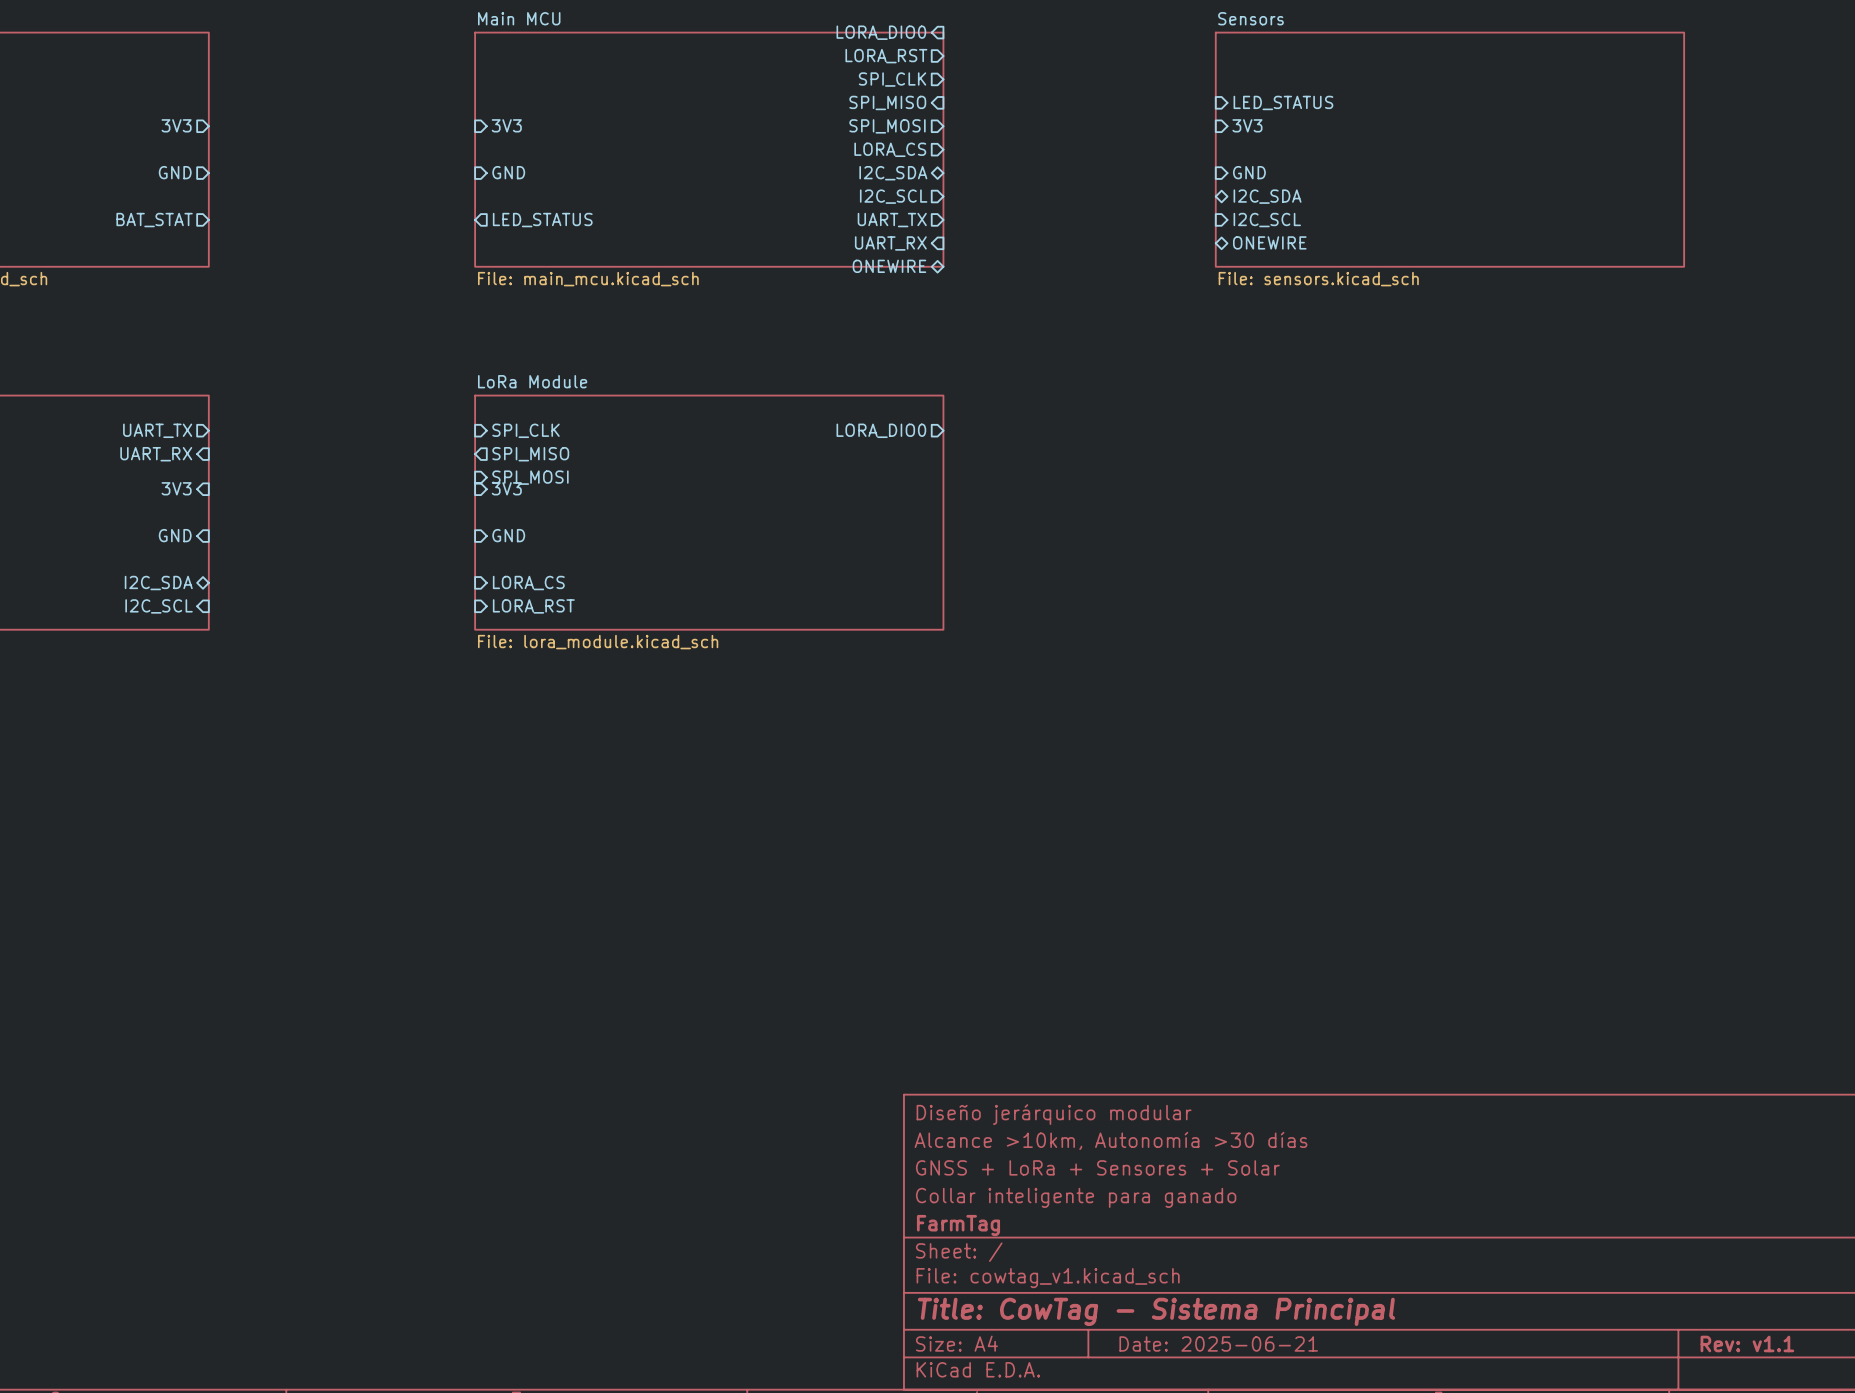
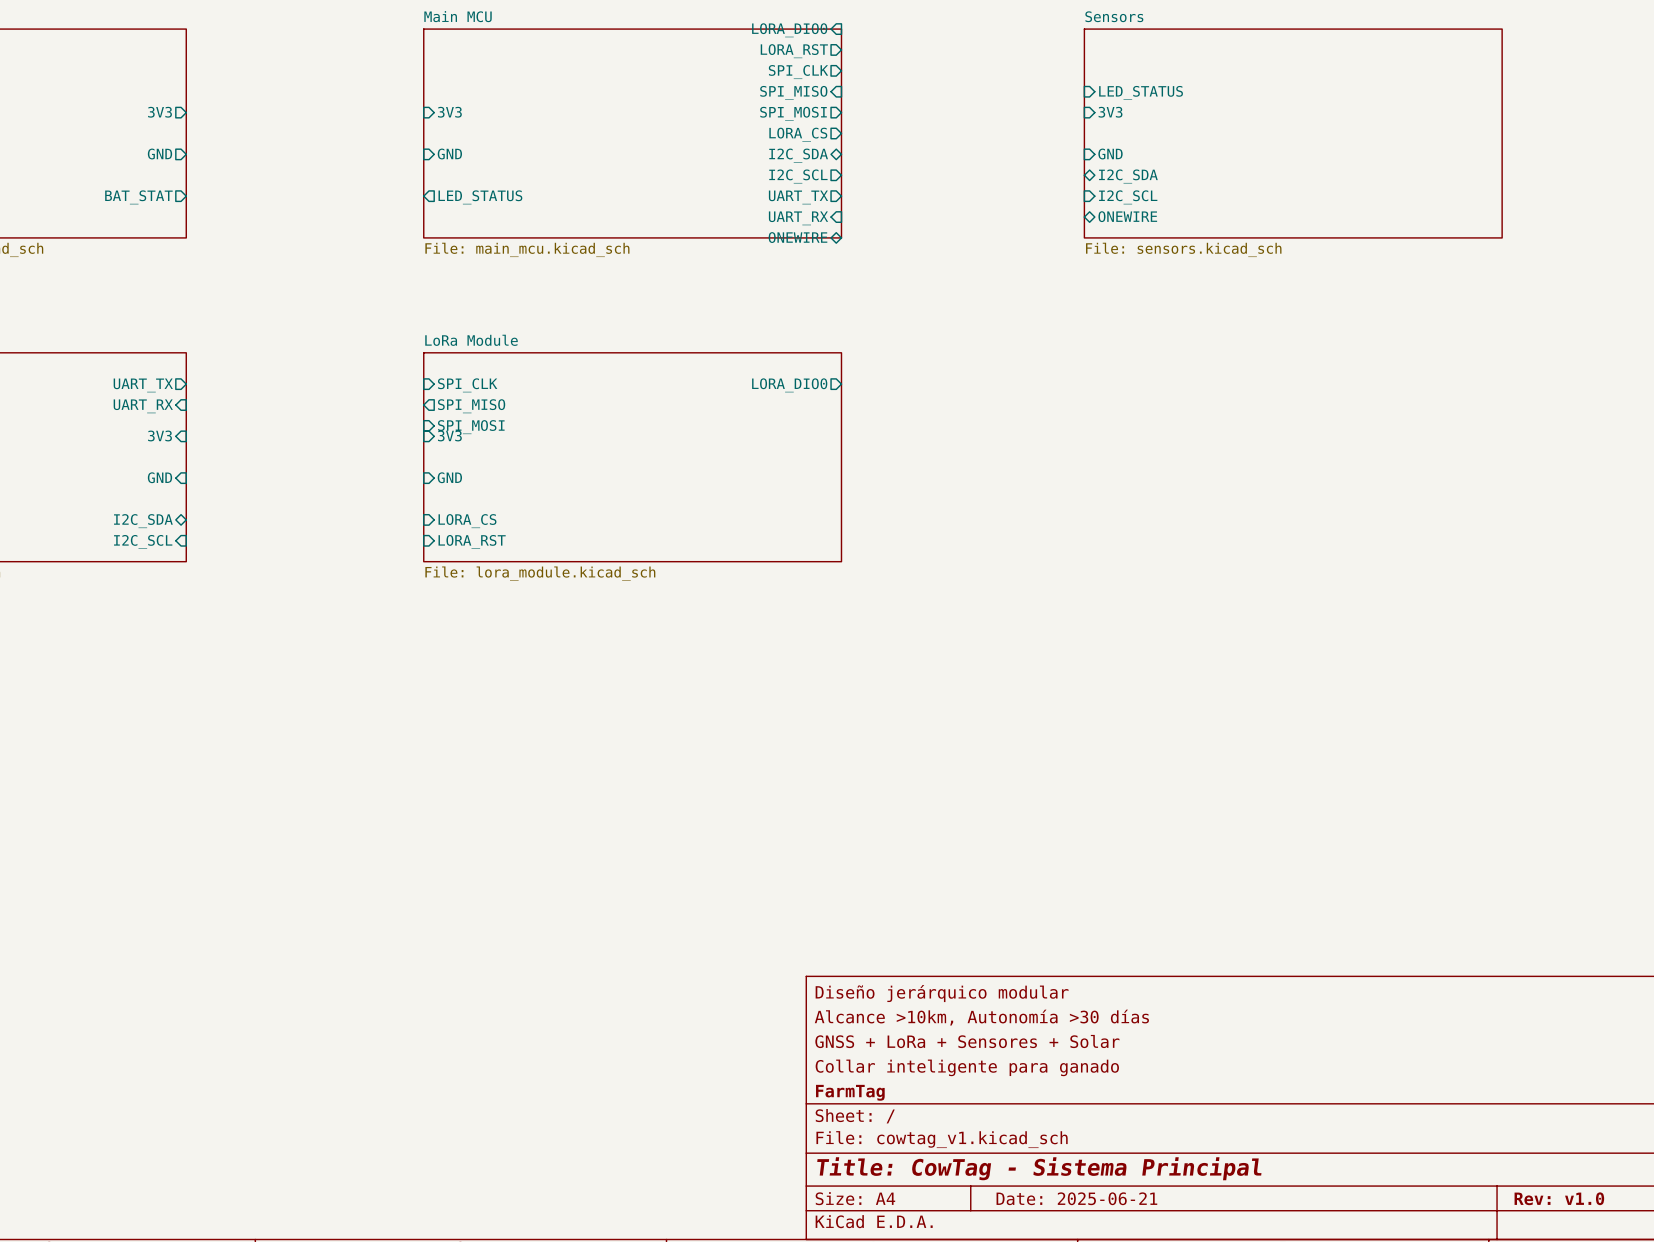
title block: Rev: v1.1 (1747, 1343) -> Rev: v1.0 (1559, 1198)

